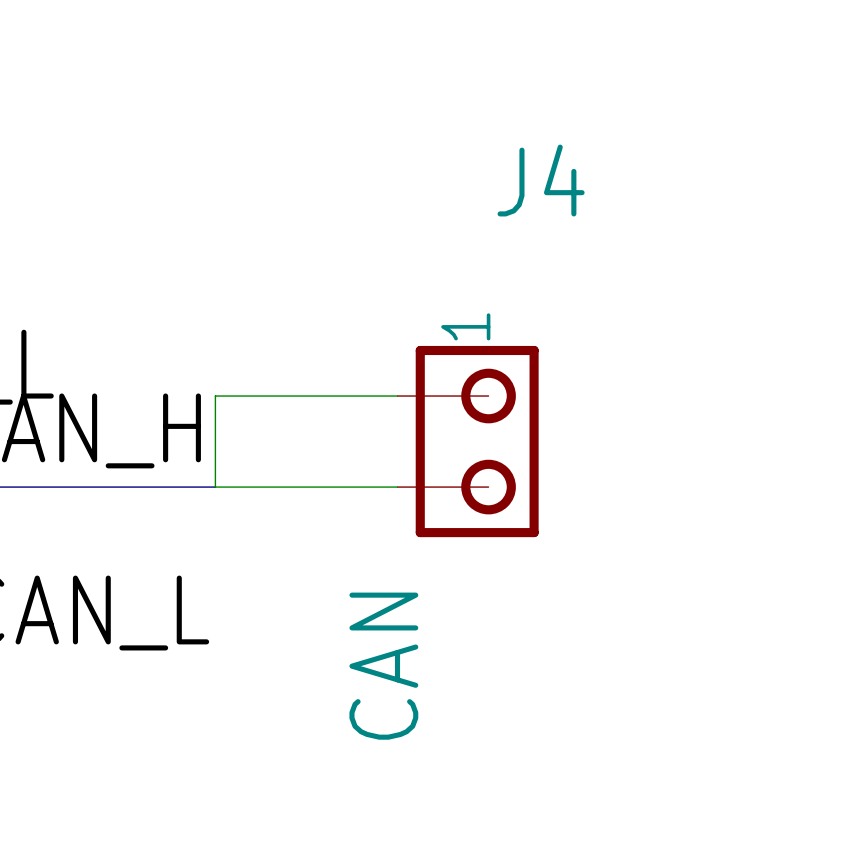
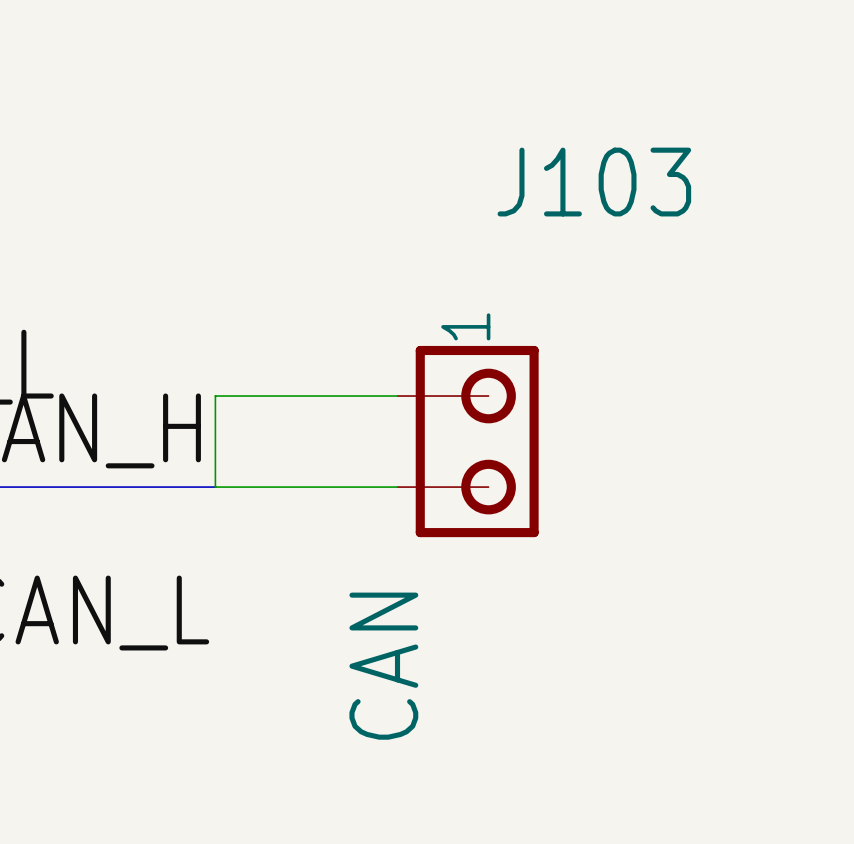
J4 name: J4 (541, 180) -> J103 (594, 182)

